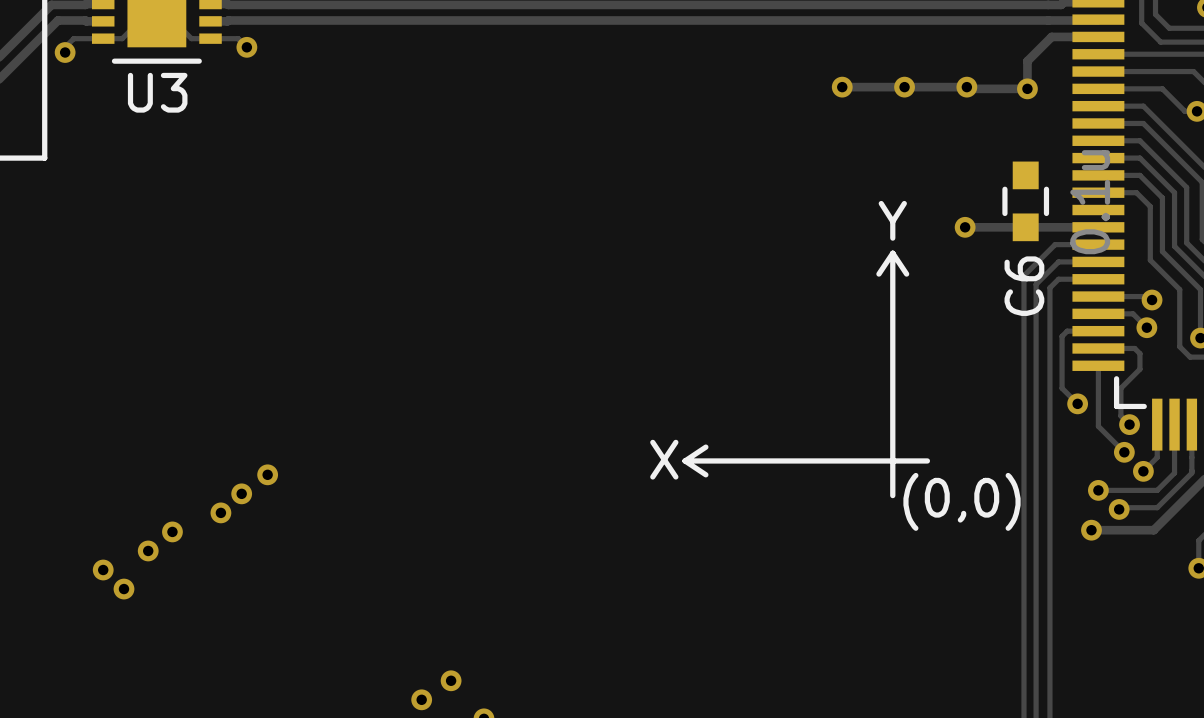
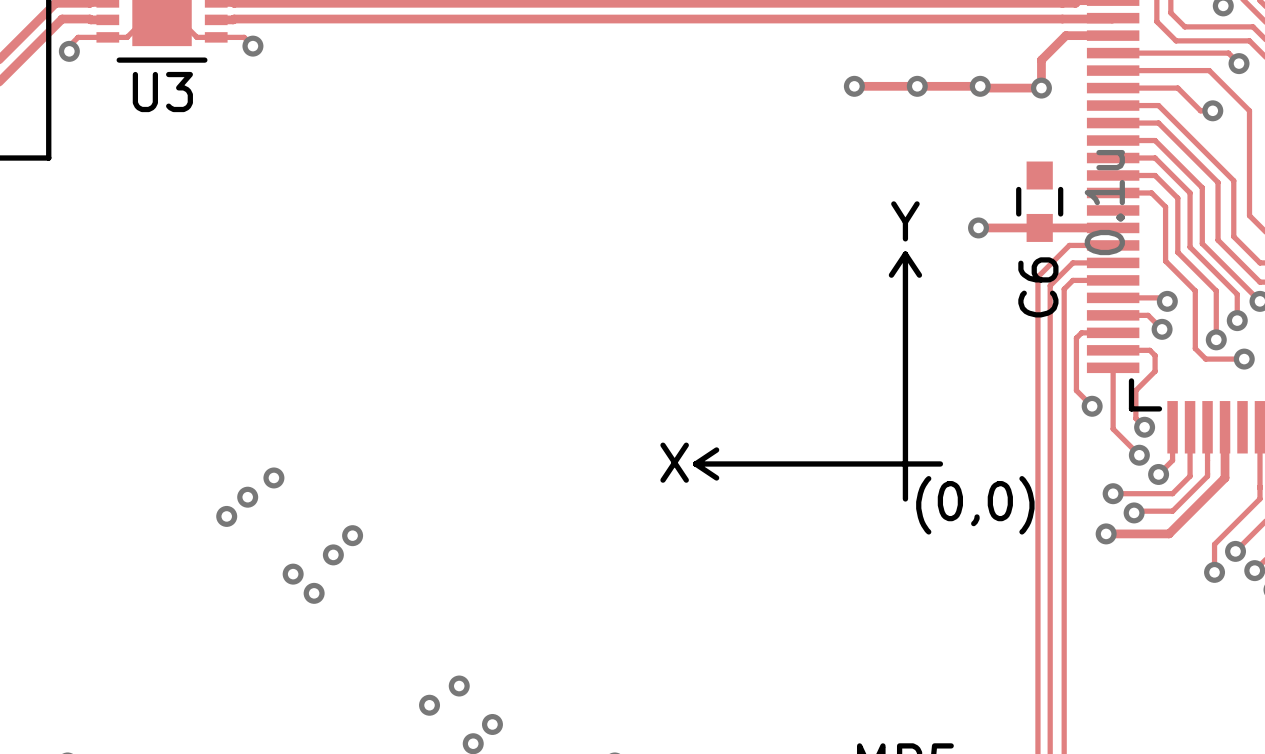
via: (172, 531) -> none
via: none -> (352, 535)
via: (148, 550) -> none
via: none -> (333, 554)
via: (103, 570) -> none
via: none -> (293, 574)
via: (123, 589) -> none
via: none -> (314, 593)

